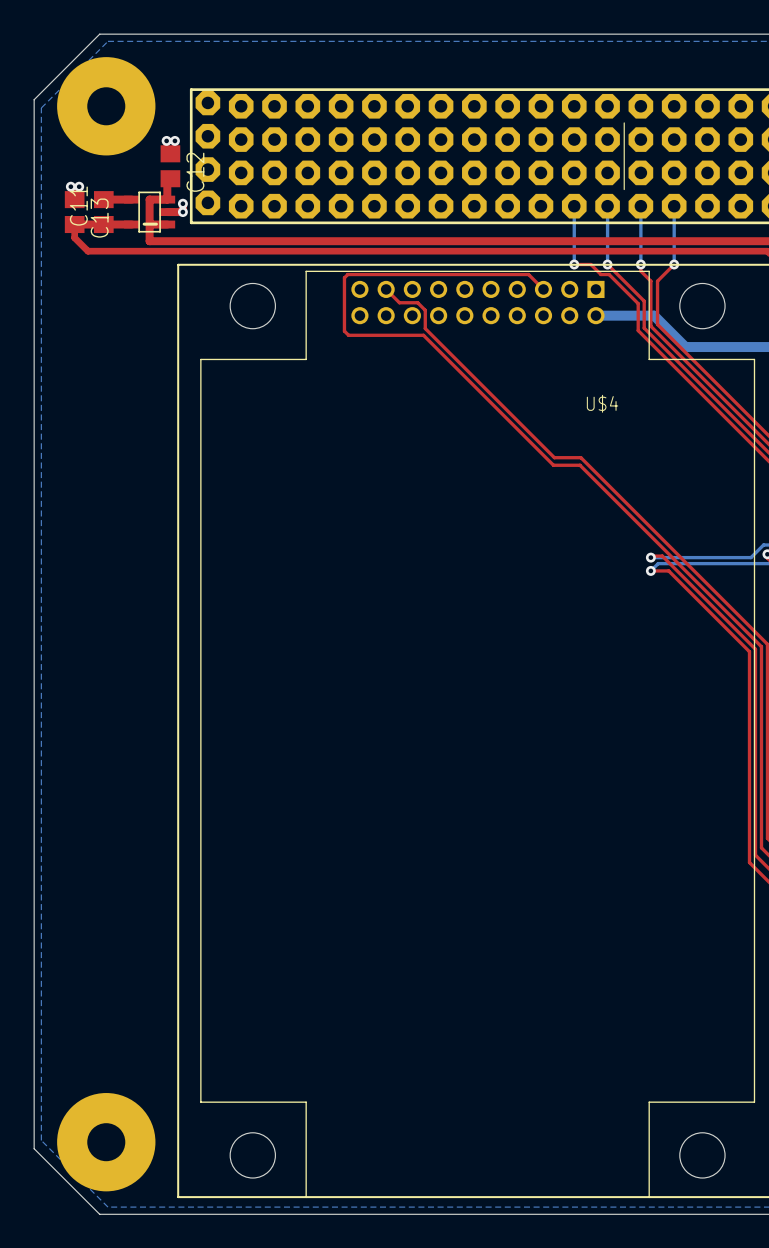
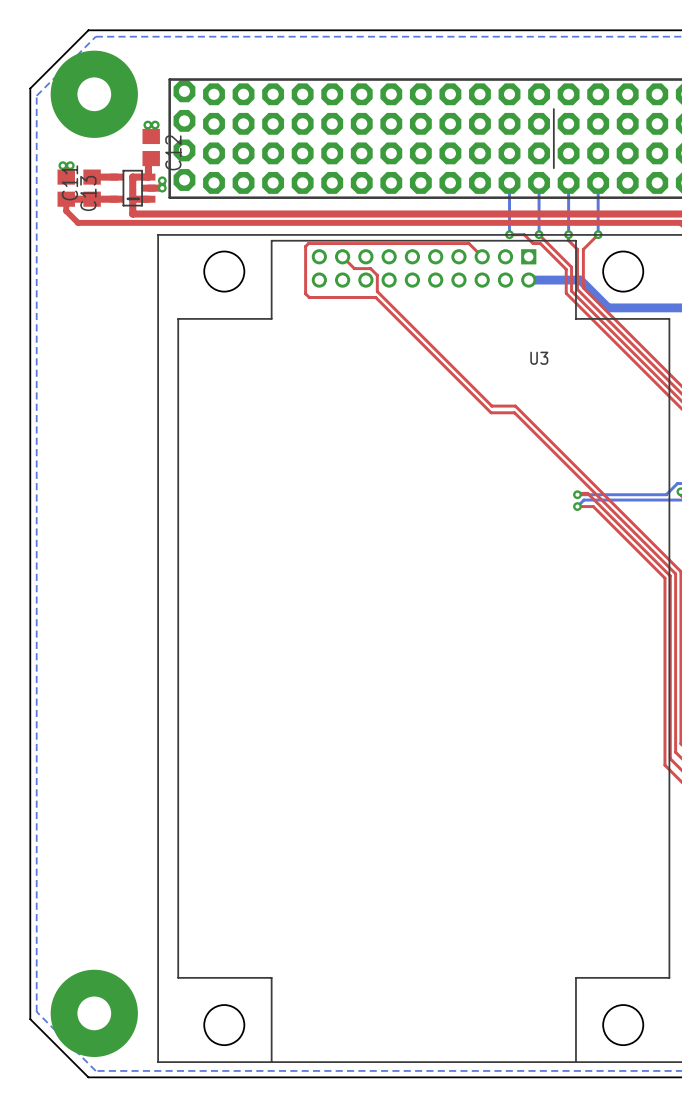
U$4 name: U$4 (602, 403) -> U3 (539, 358)

